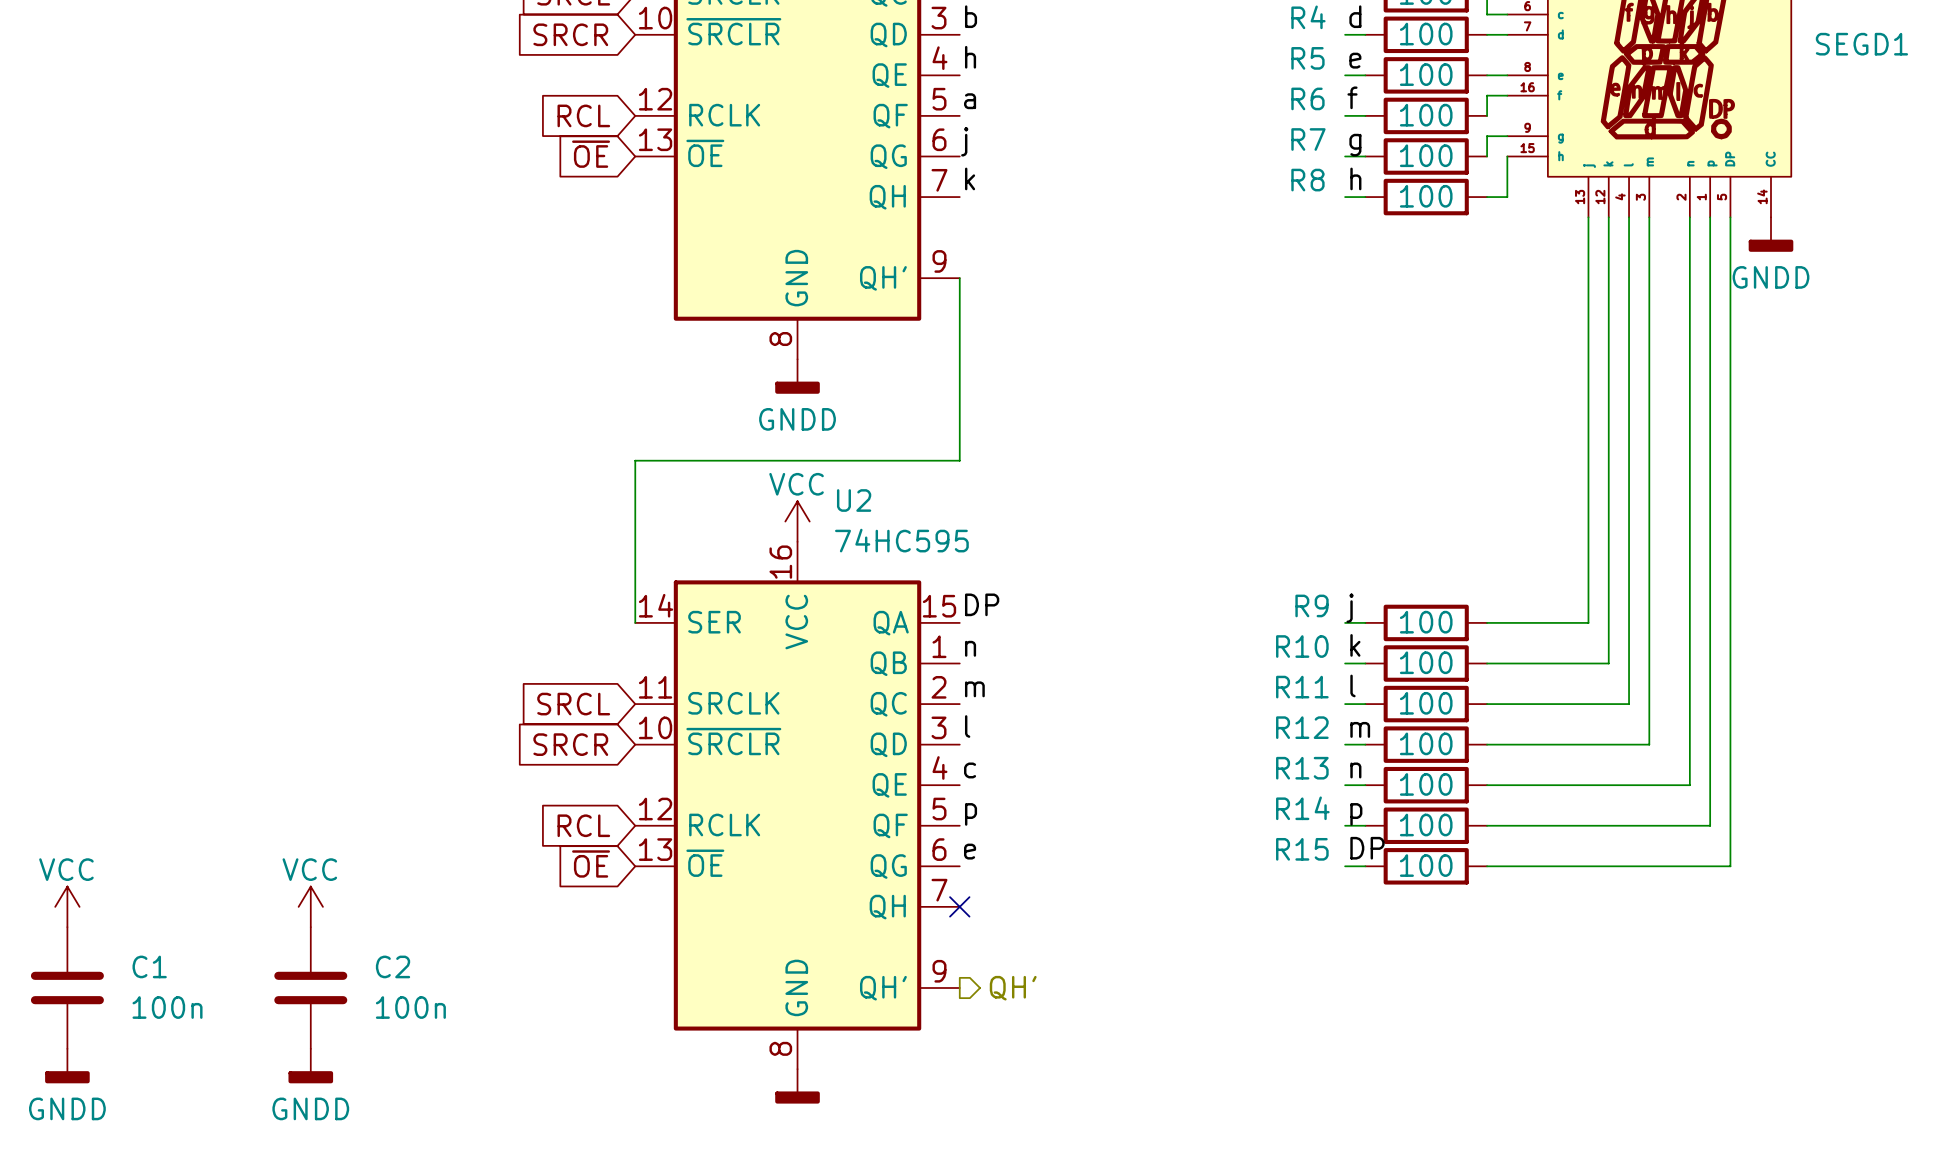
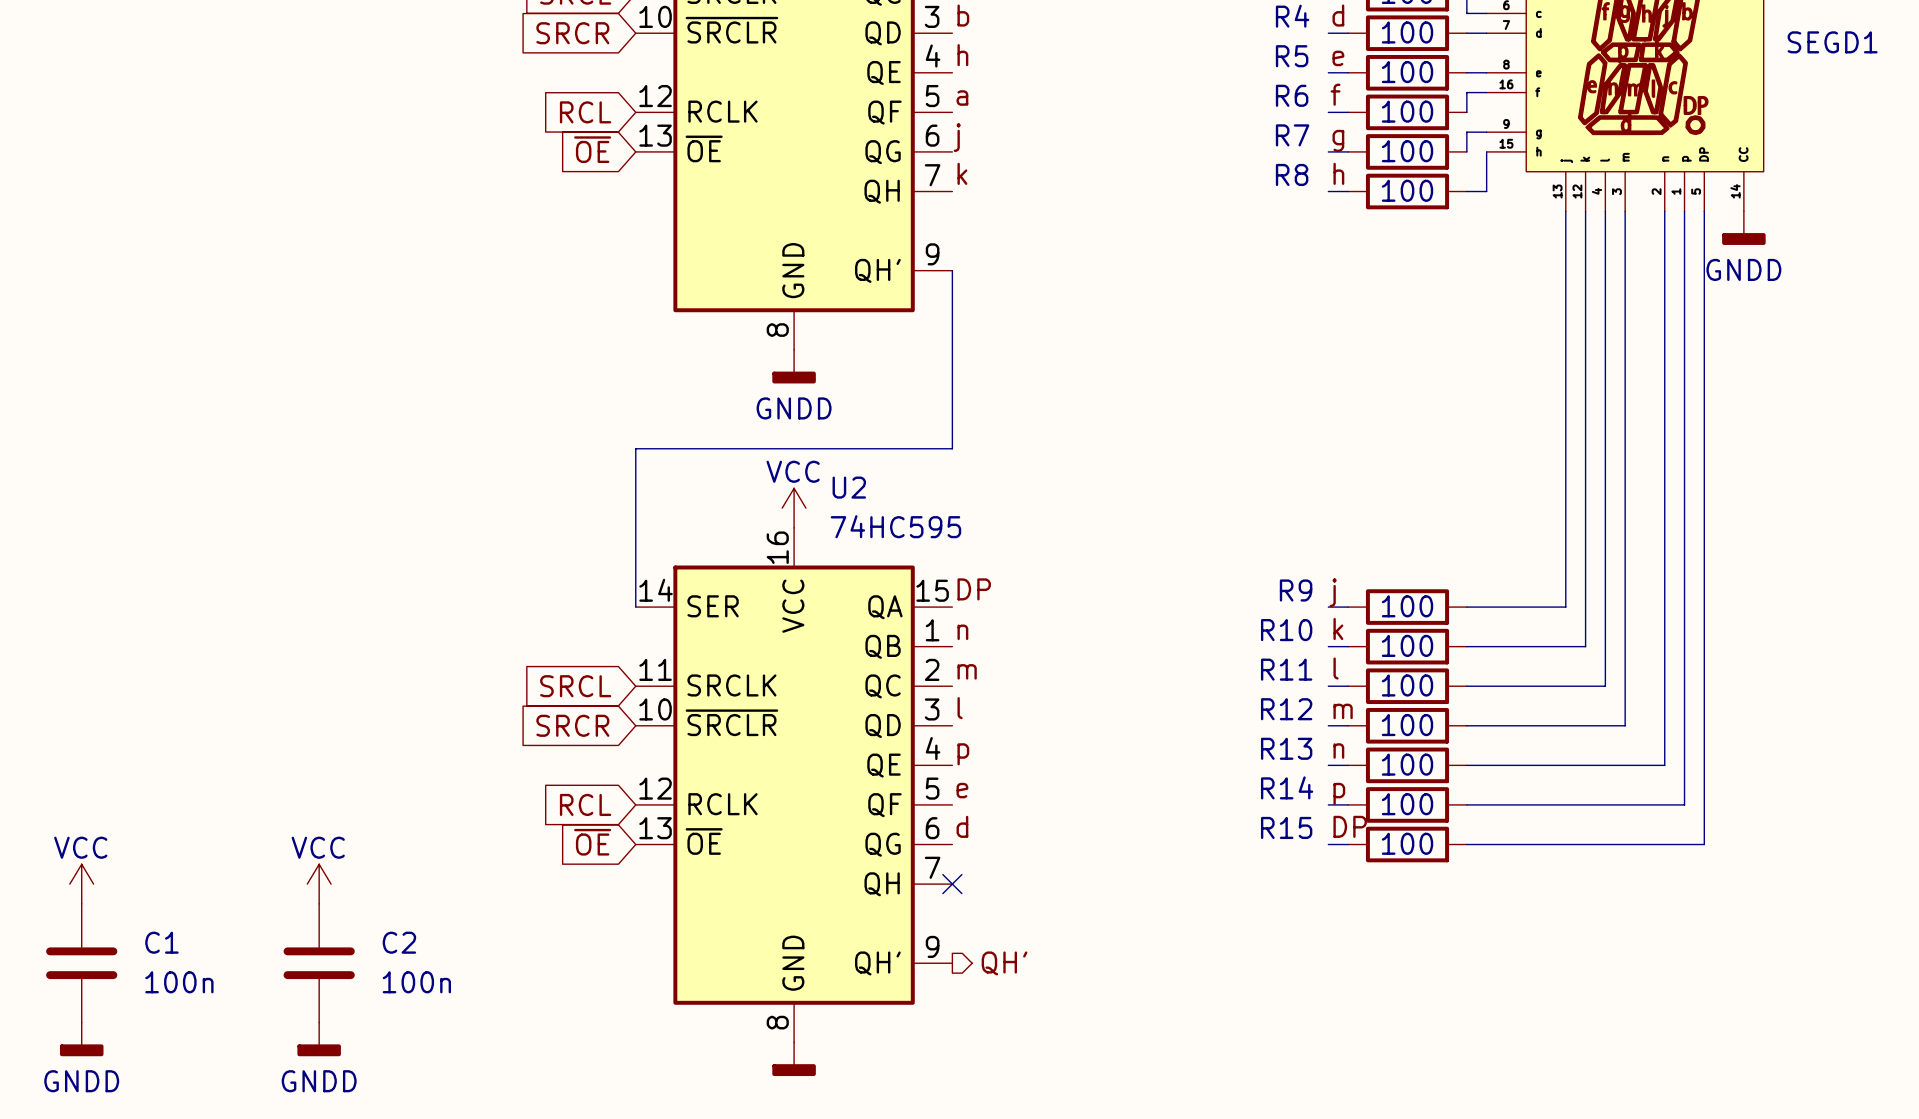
label: c (970, 770) -> p (963, 754)
label: p (971, 814) -> e (962, 790)
label: e (970, 851) -> d (962, 826)

